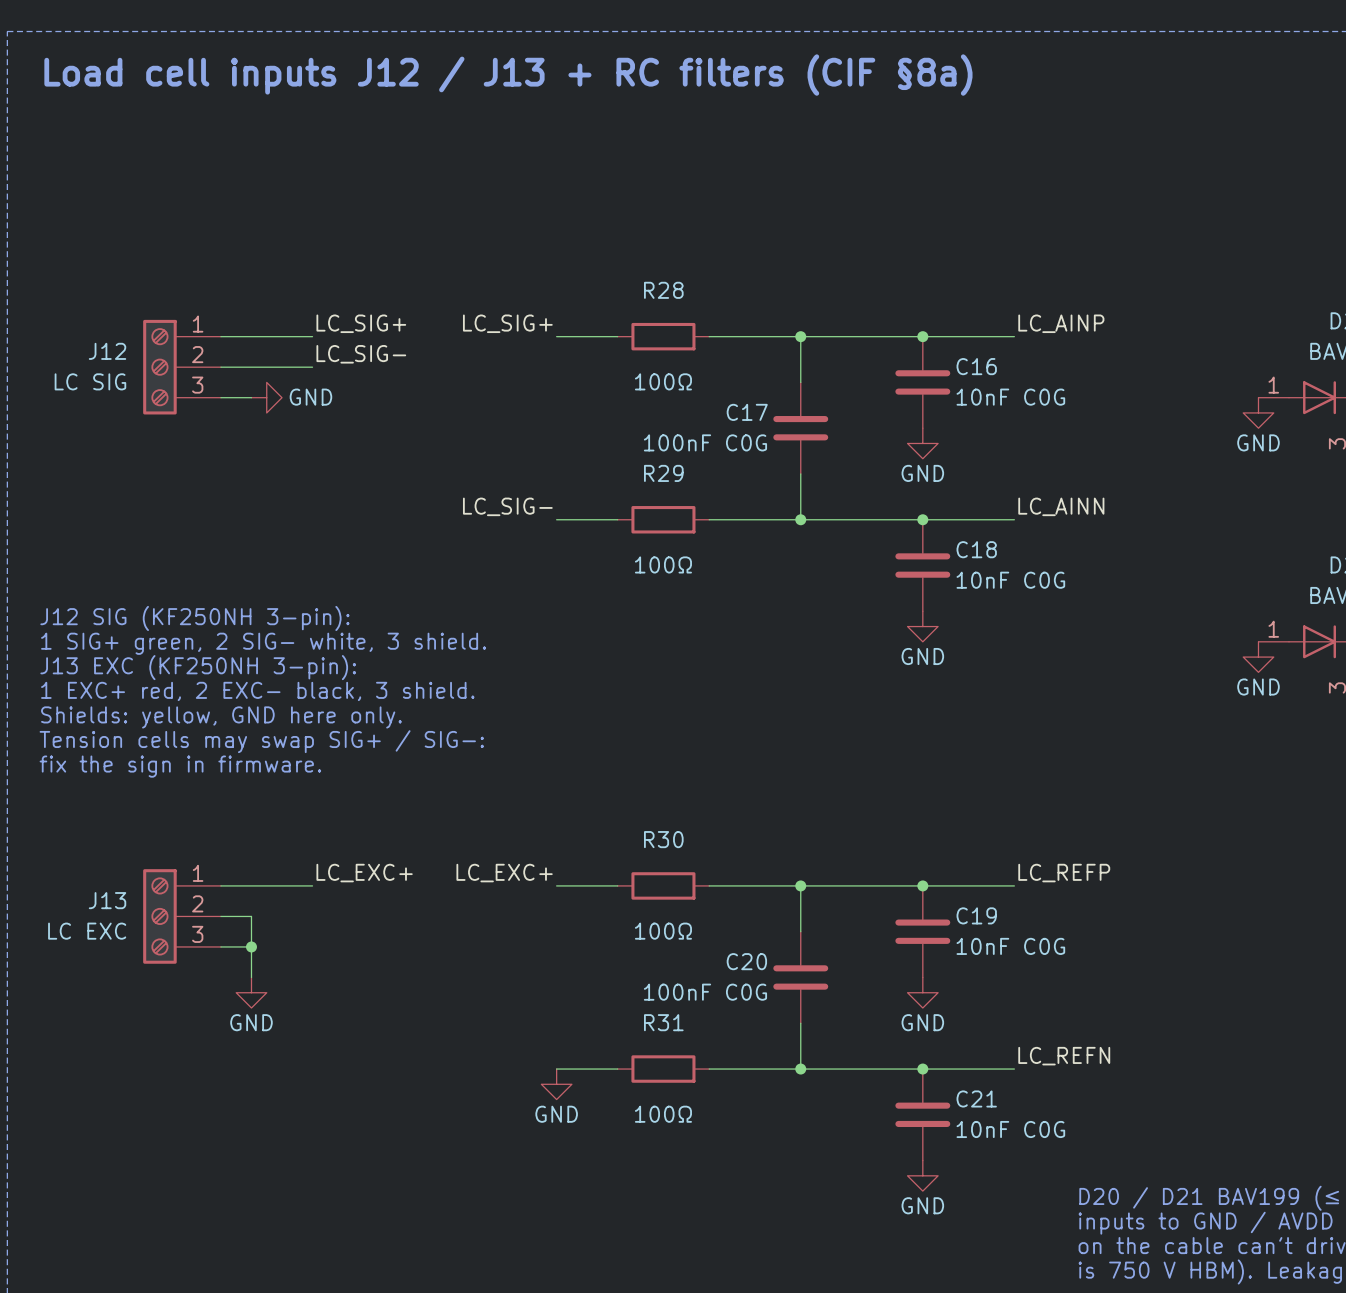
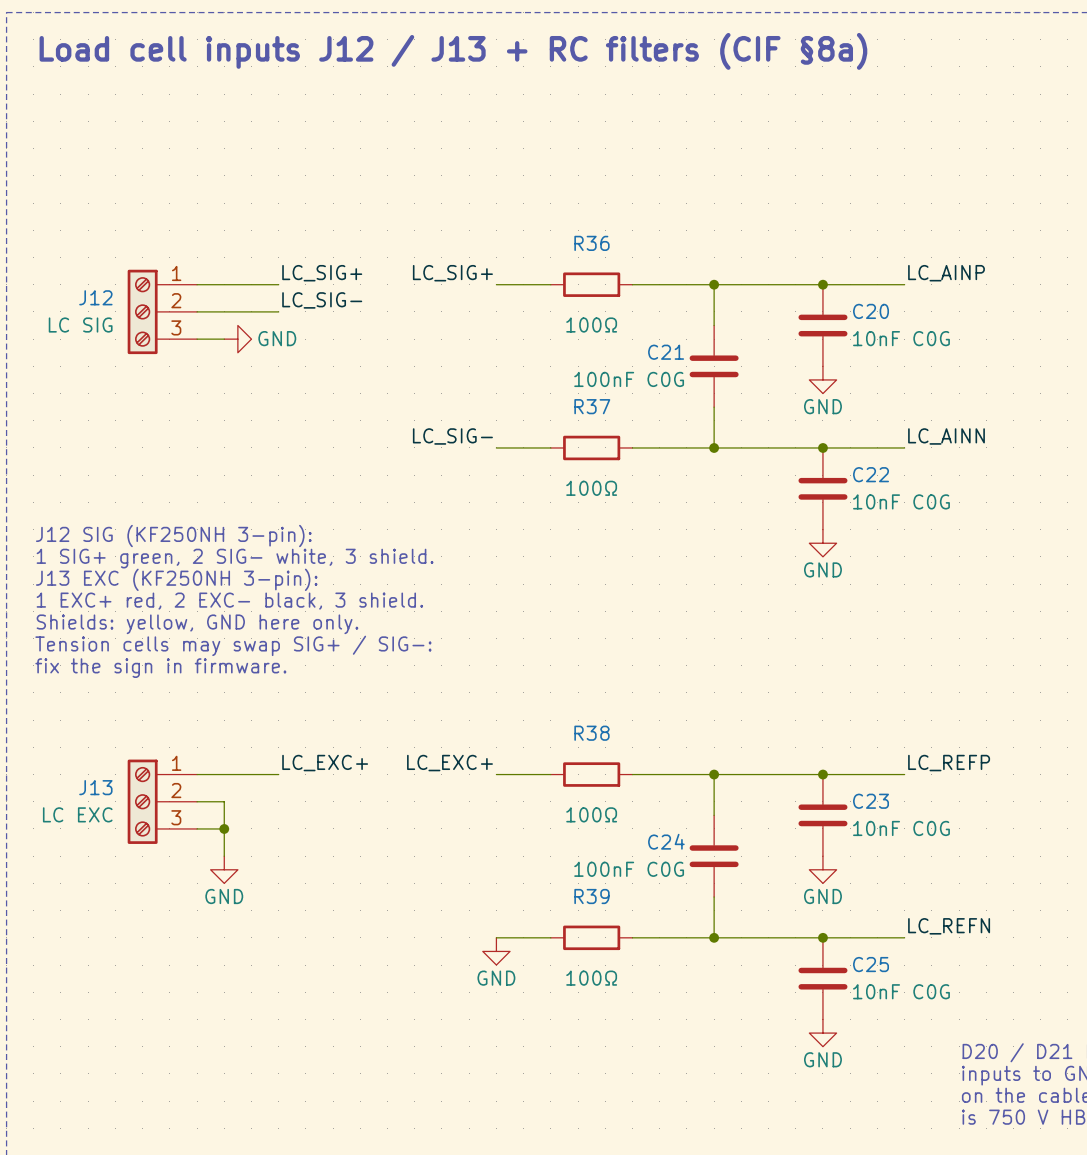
R28 name: R28 (663, 290) -> R36 (591, 243)
C16 name: C16 (976, 366) -> C20 (871, 311)
C17 name: C17 (747, 412) -> C21 (666, 352)
R29 name: R29 (663, 473) -> R37 (592, 406)
C18 name: C18 (976, 549) -> C22 (871, 474)
R30 name: R30 (663, 839) -> R38 (591, 733)
C19 name: C19 (976, 915) -> C23 (871, 801)
C20 name: C20 (746, 961) -> C24 (666, 841)
R31 name: R31 (663, 1022) -> R39 (591, 896)
C21 name: C21 (976, 1098) -> C25 (871, 964)

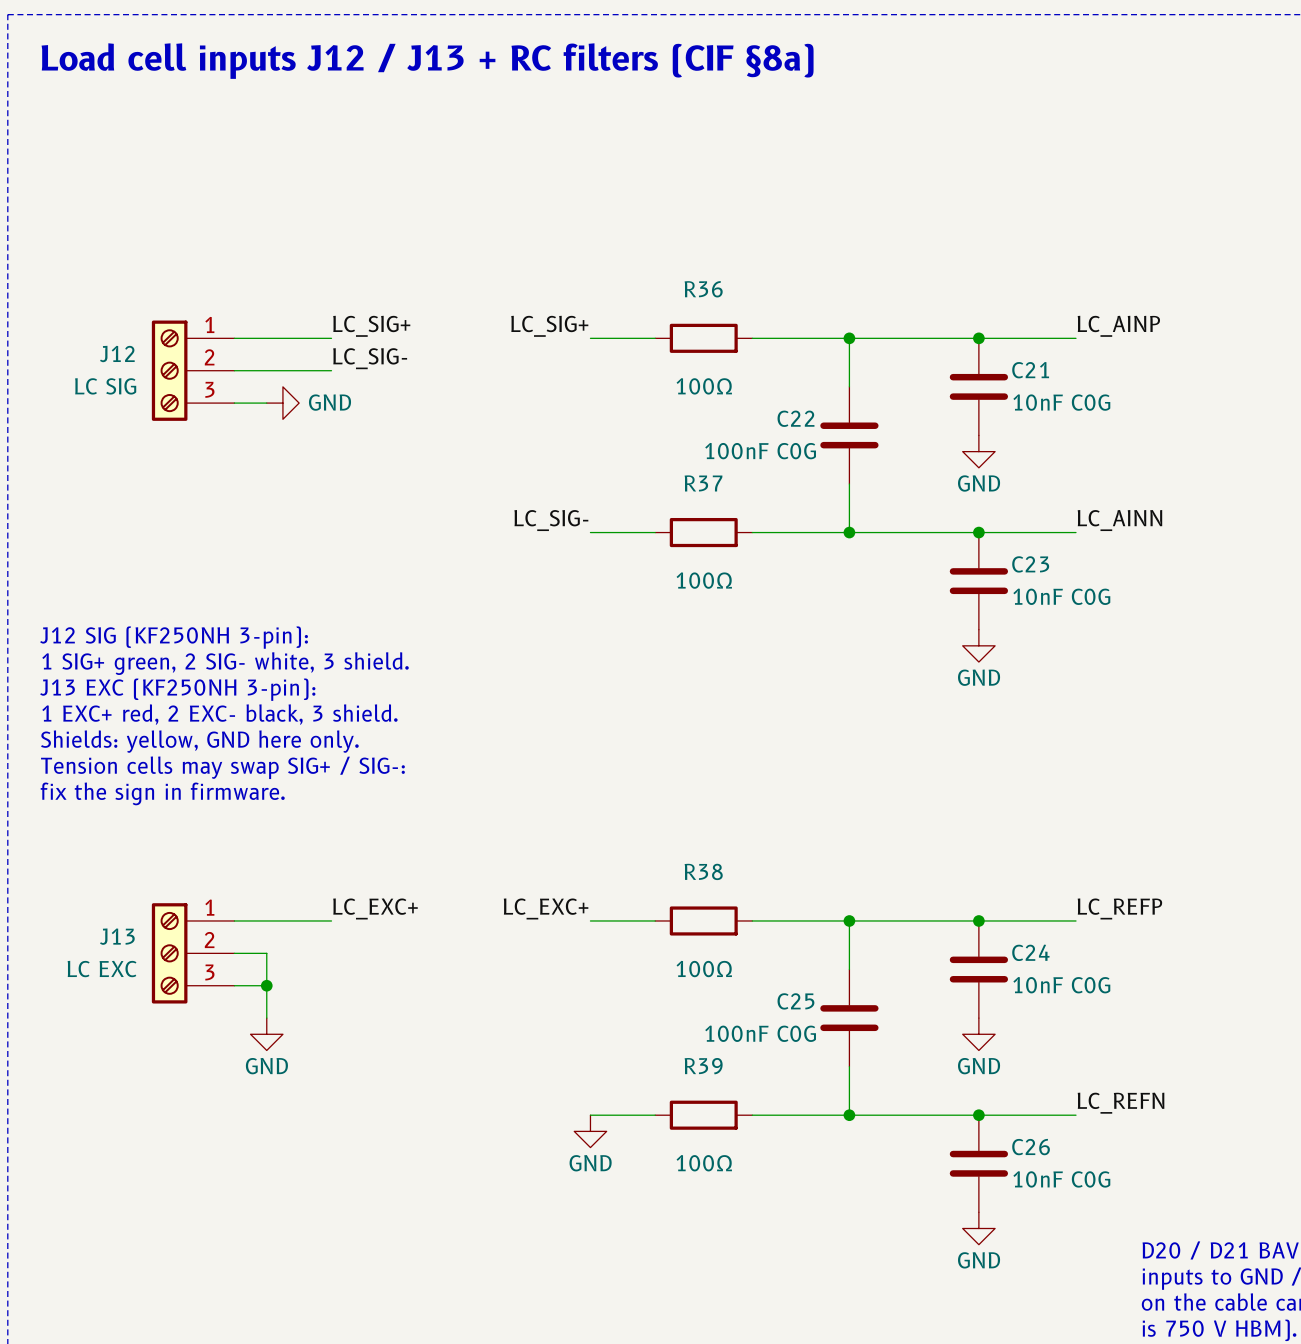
C20 name: C20 (871, 311) -> C21 (1030, 370)
C21 name: C21 (666, 352) -> C22 (795, 418)
C22 name: C22 (871, 474) -> C23 (1030, 564)
C23 name: C23 (871, 801) -> C24 (1030, 952)
C24 name: C24 (666, 841) -> C25 (795, 1001)
C25 name: C25 (871, 964) -> C26 (1031, 1147)

